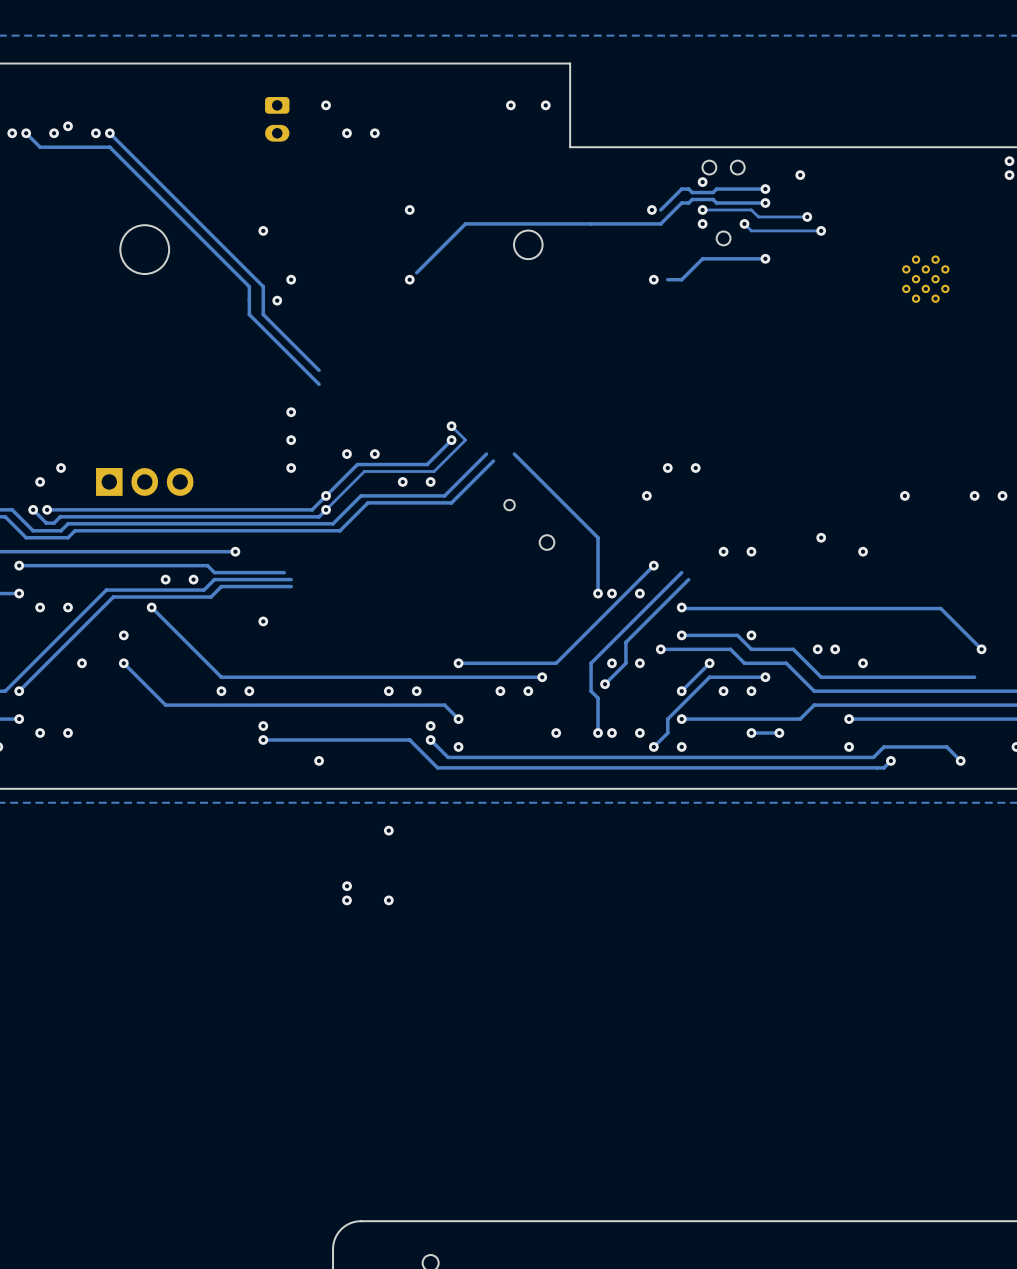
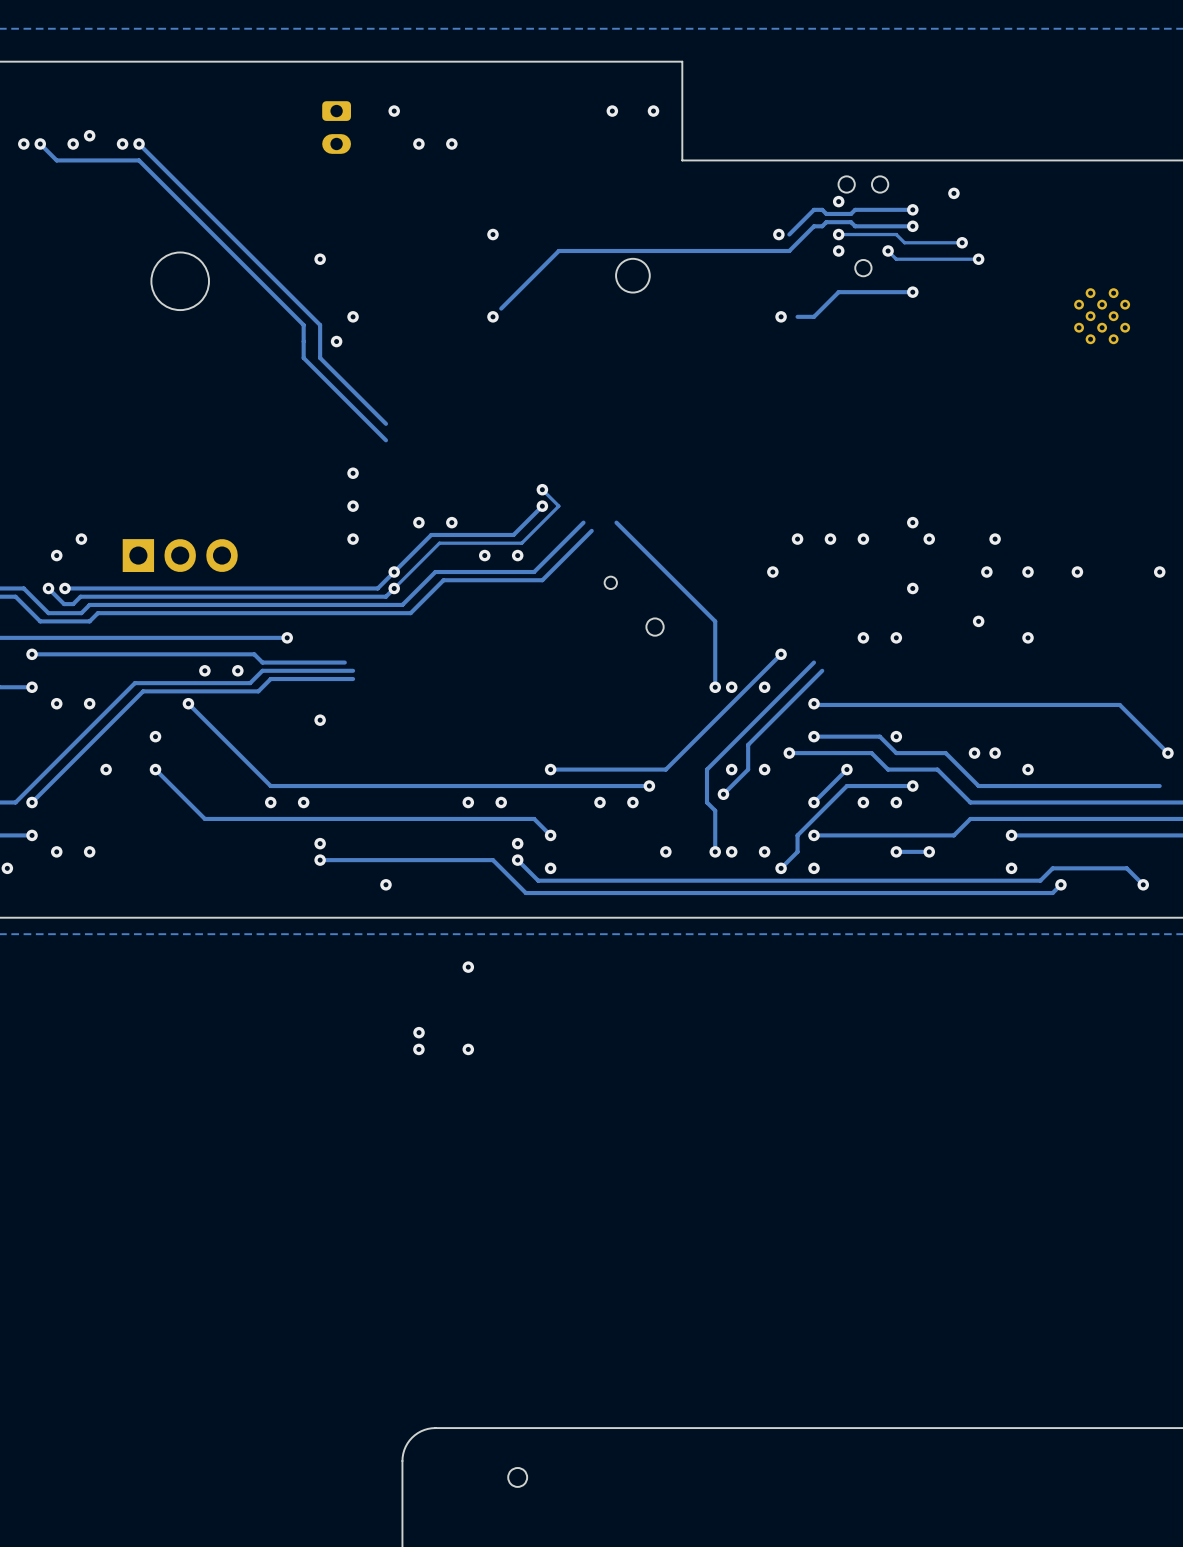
via: none -> (912, 522)
via: none -> (863, 539)
via: none -> (929, 539)
via: none -> (995, 539)
via: none -> (986, 572)
via: none -> (1028, 572)
via: none -> (912, 588)

